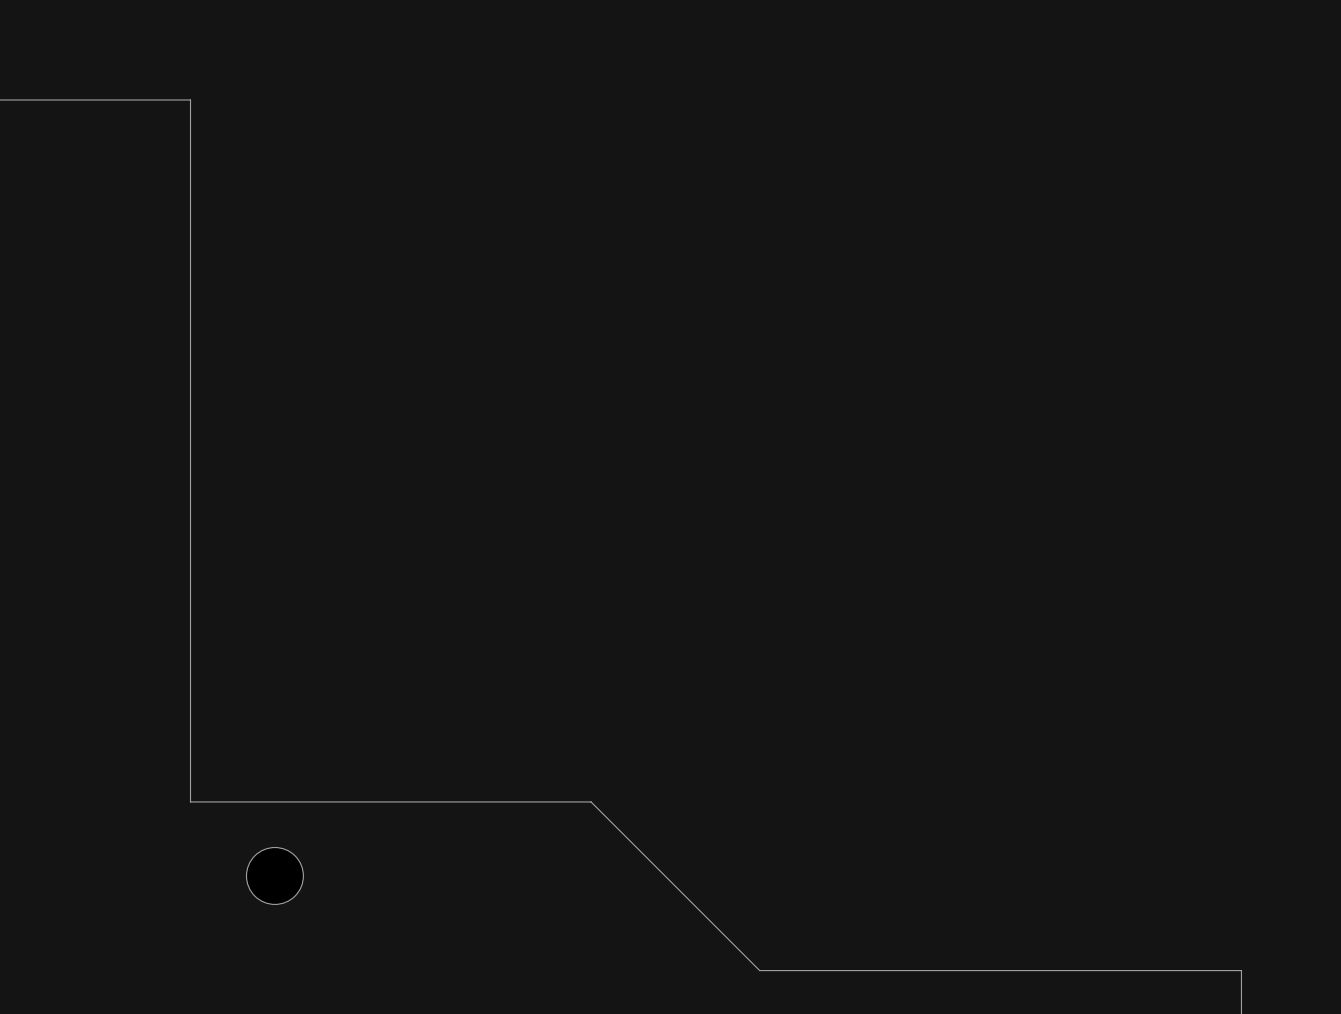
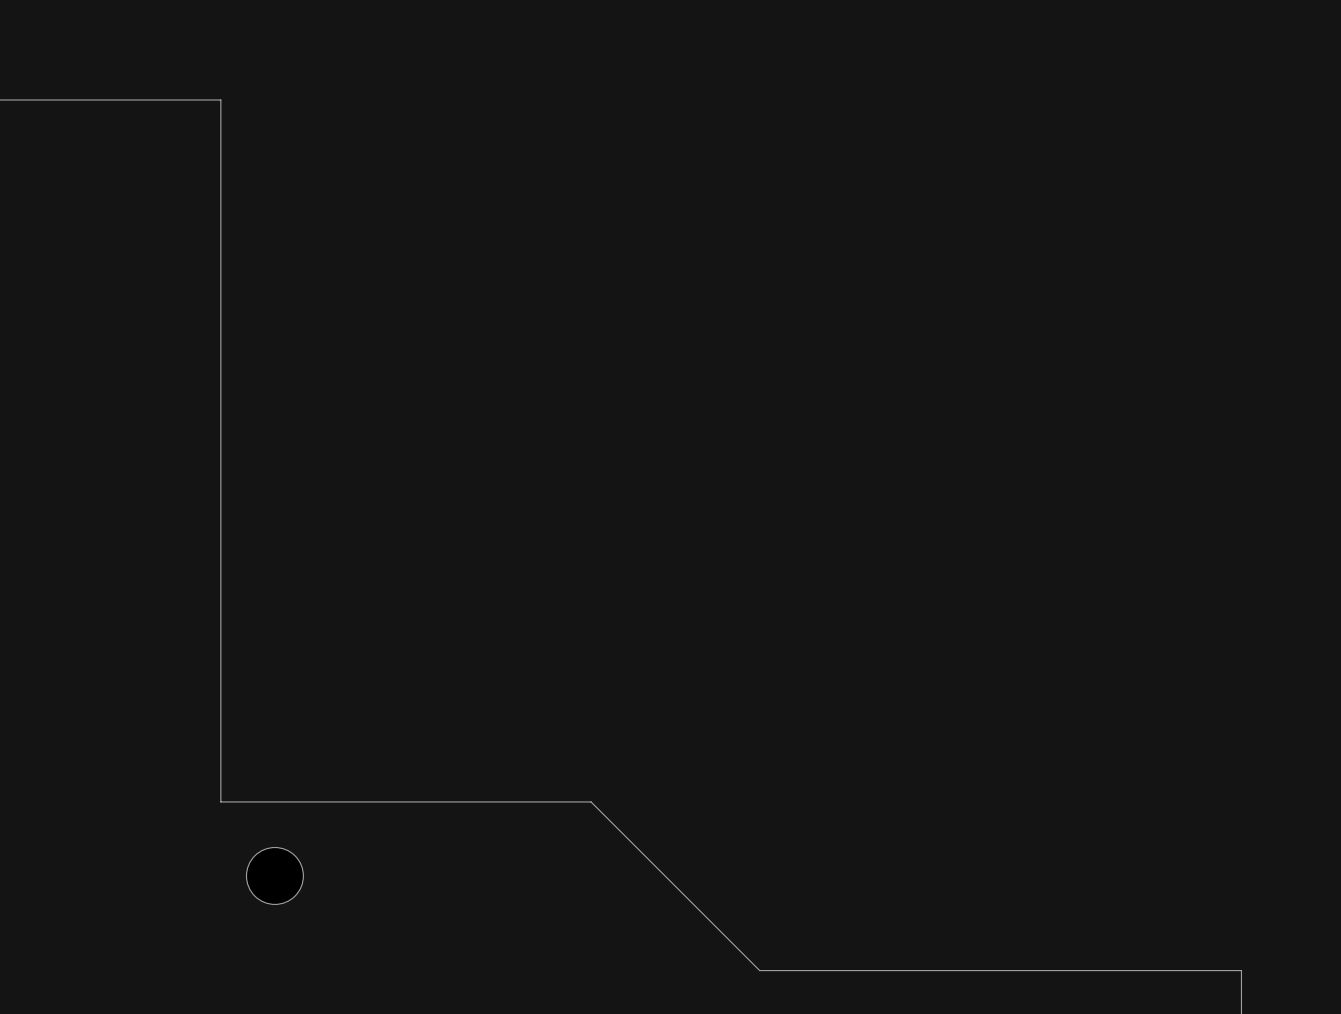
board edge: (190, 100) (190, 801) (220, 801) -> (190, 100) (220, 100) (220, 801)

